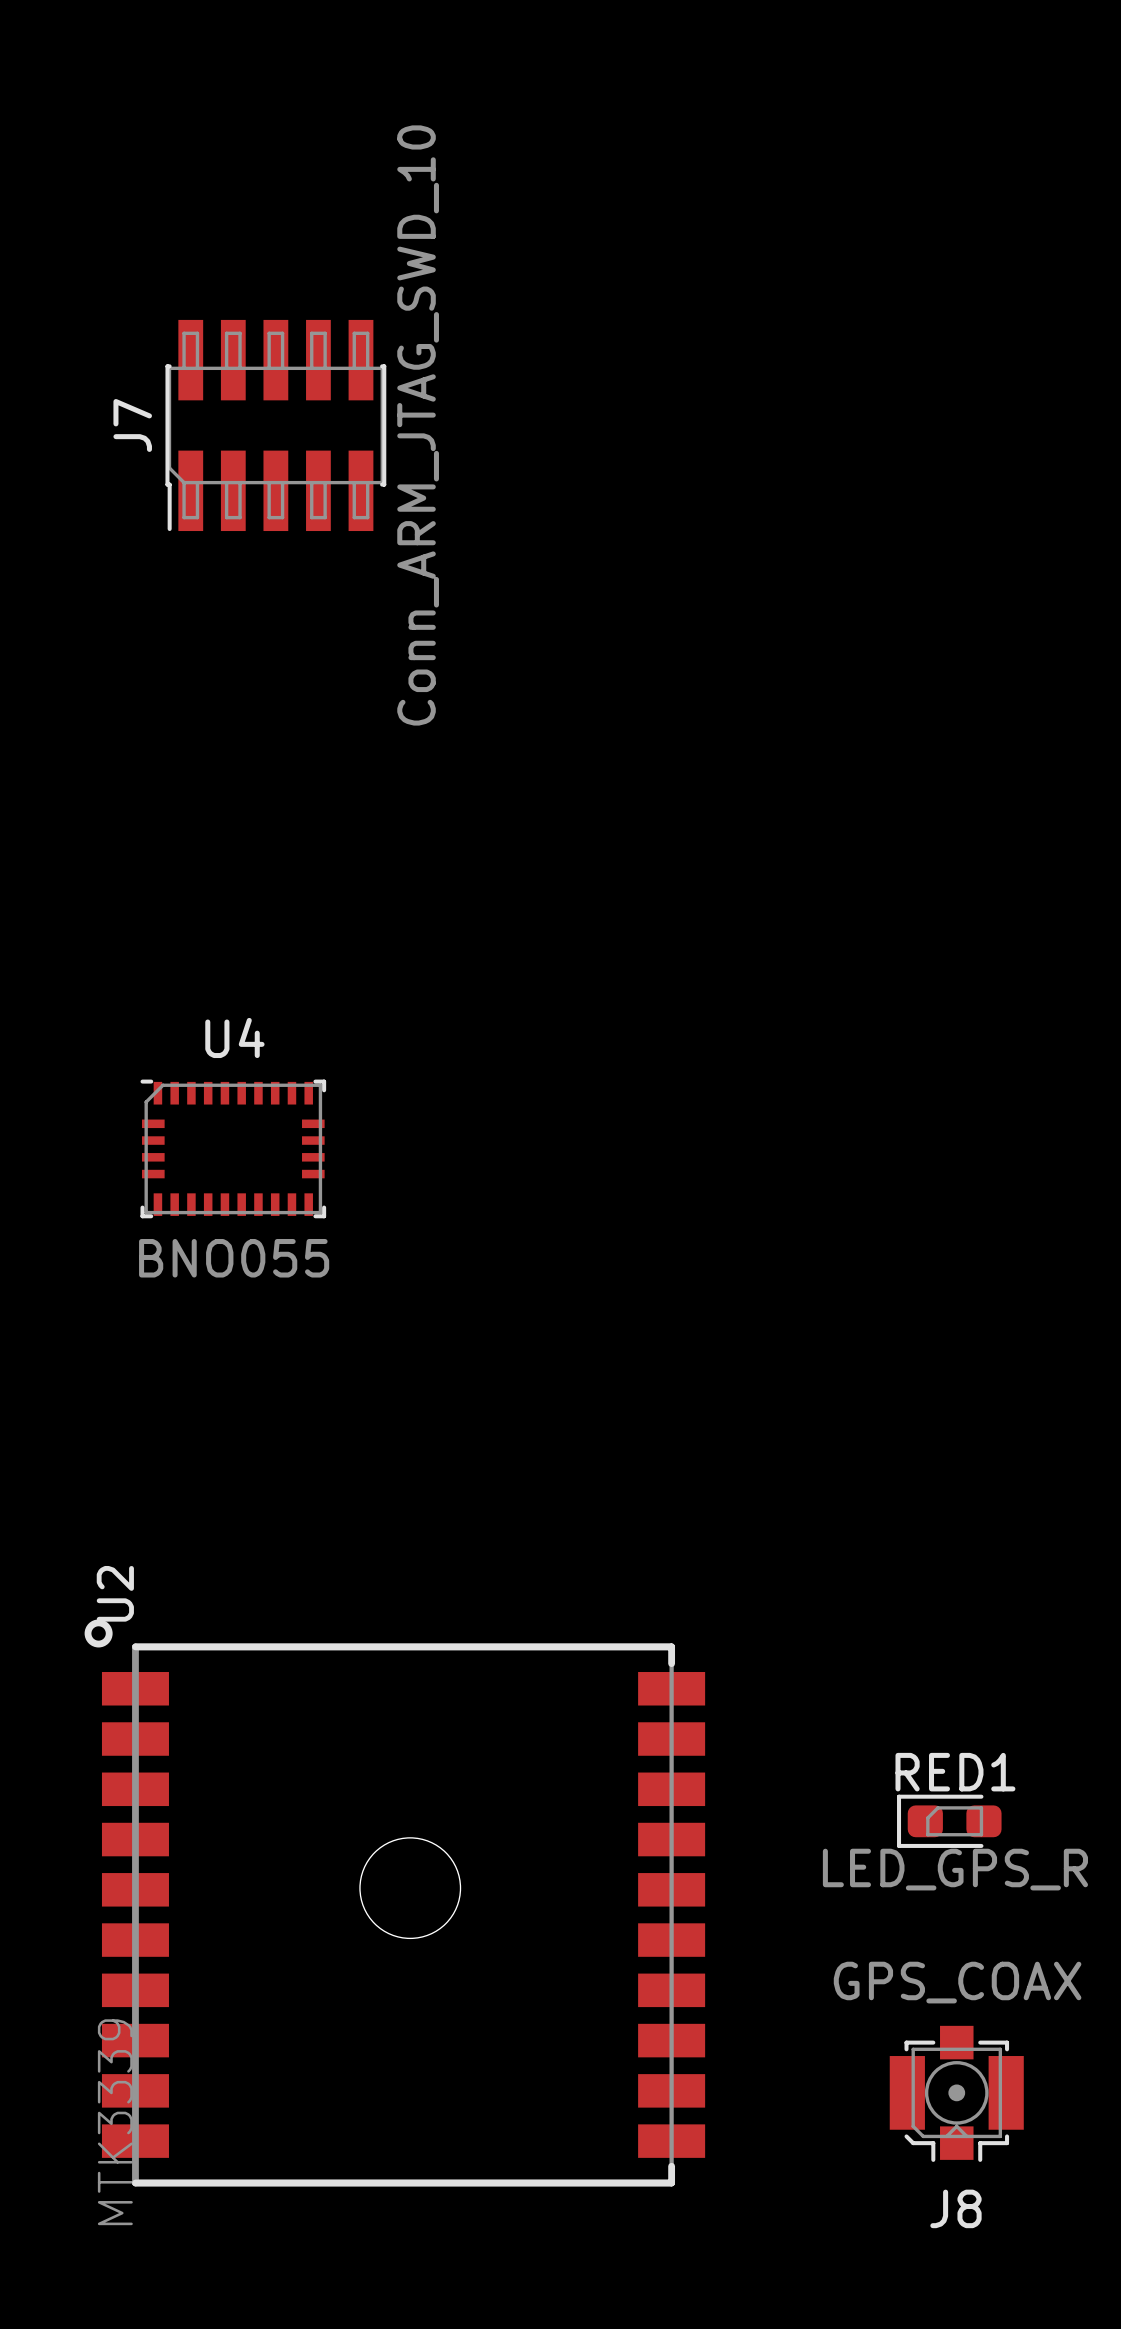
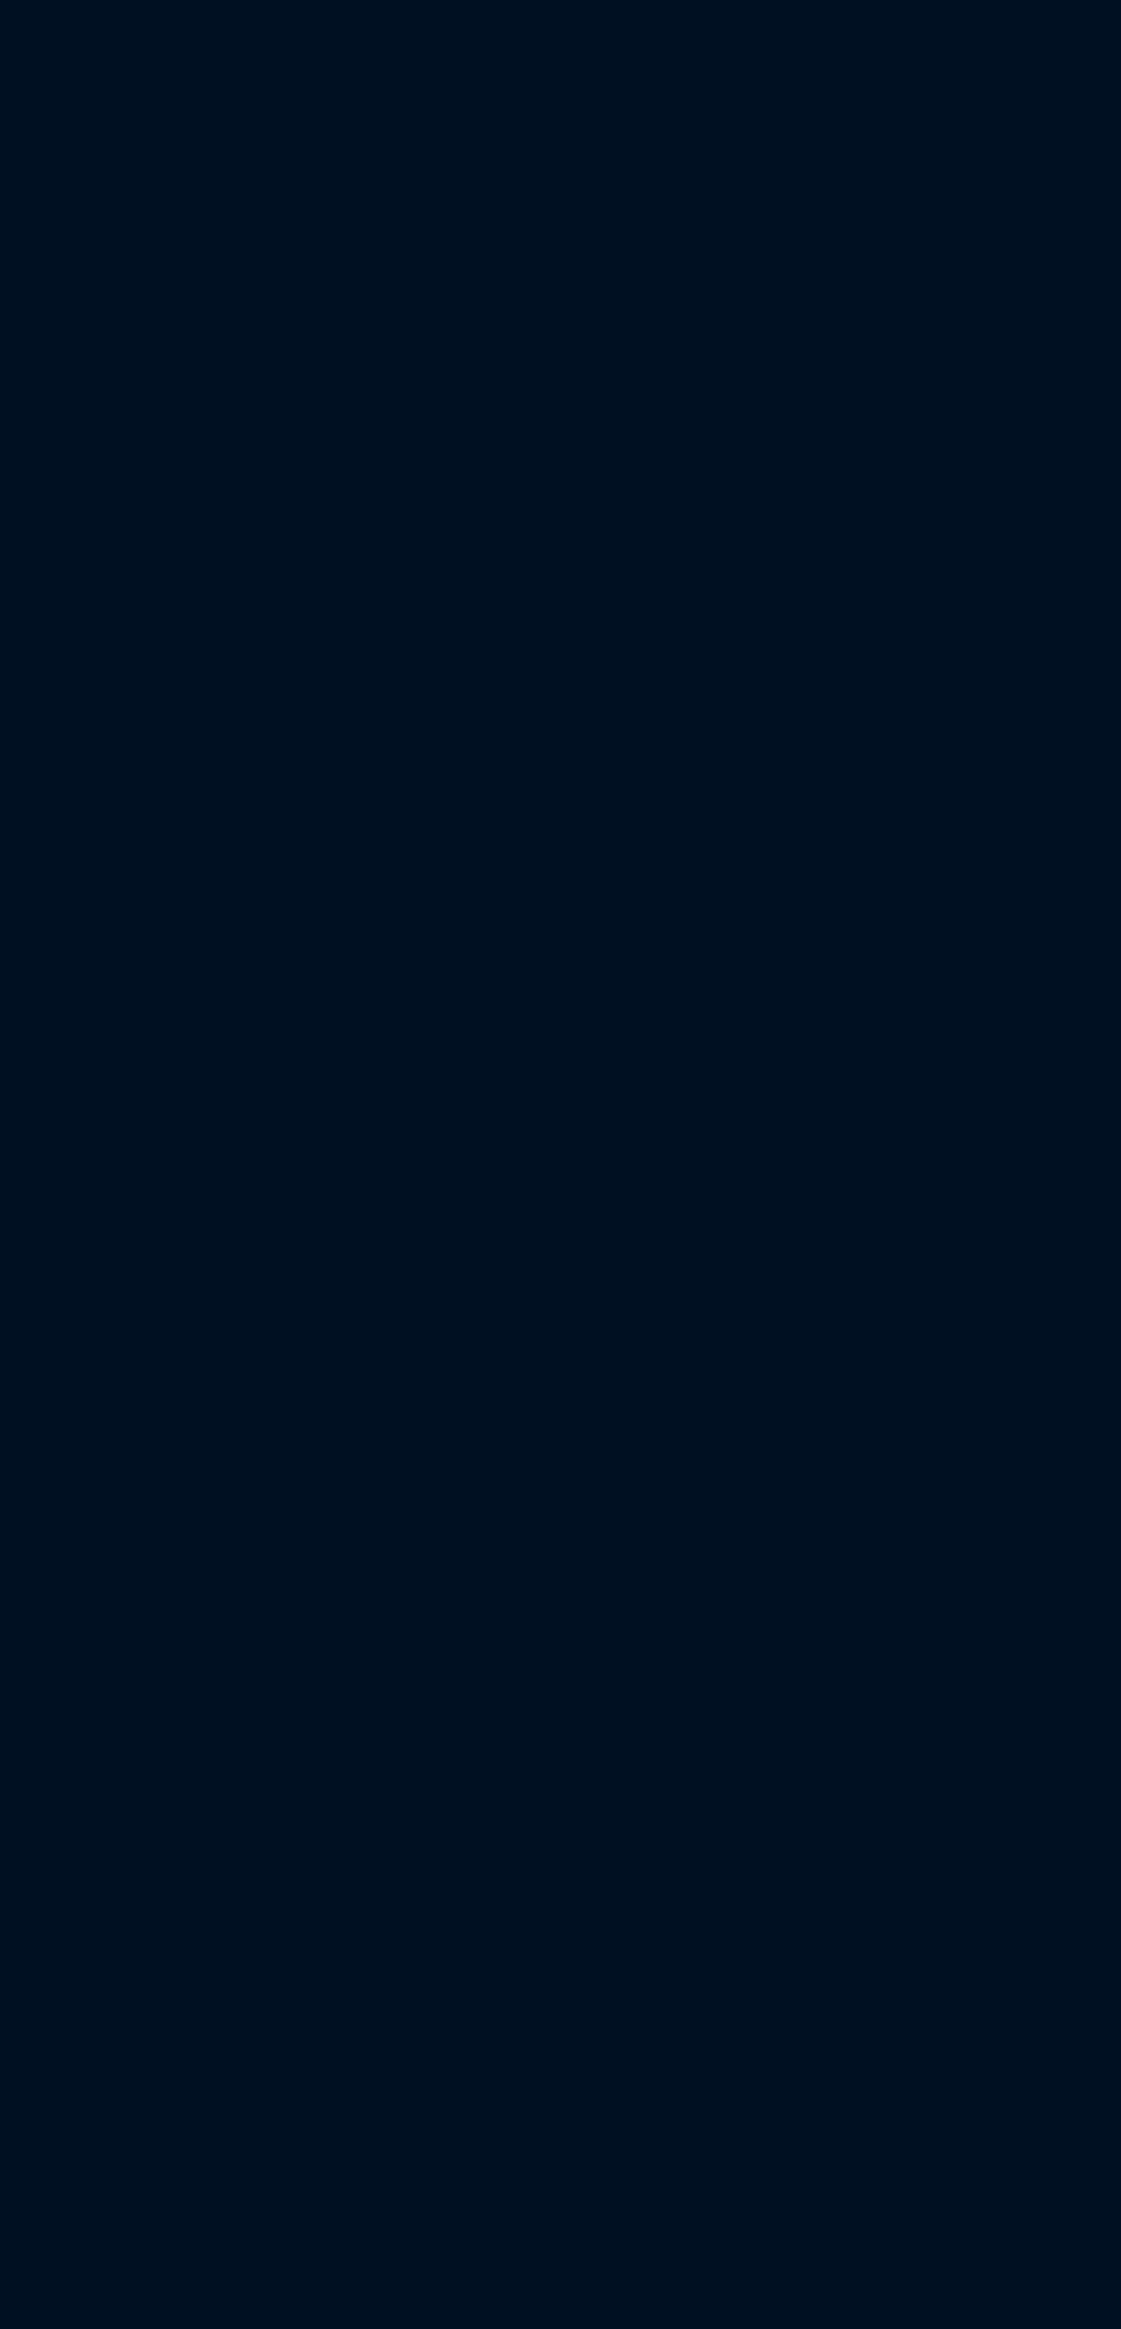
J7: Conn_ARM_JTAG_SWD_10 (275, 425) -> none
U4: BNO055 (233, 1148) -> none
RED1: LED_GPS_R (949, 1821) -> none
U2: MTK3339 (394, 1902) -> none
J8: GPS_COAX (956, 2093) -> none

